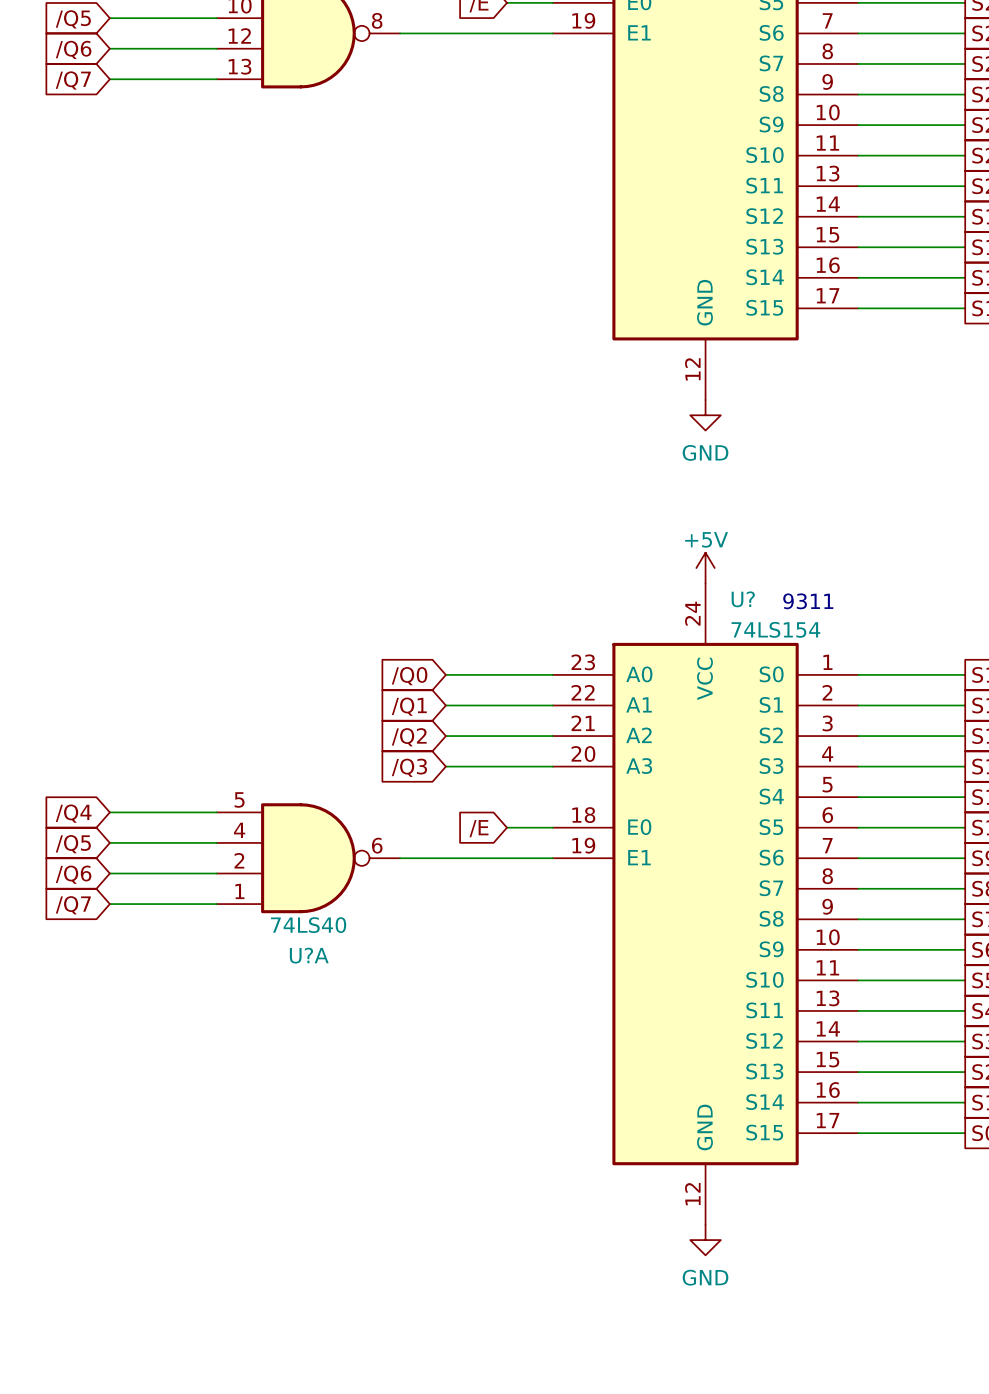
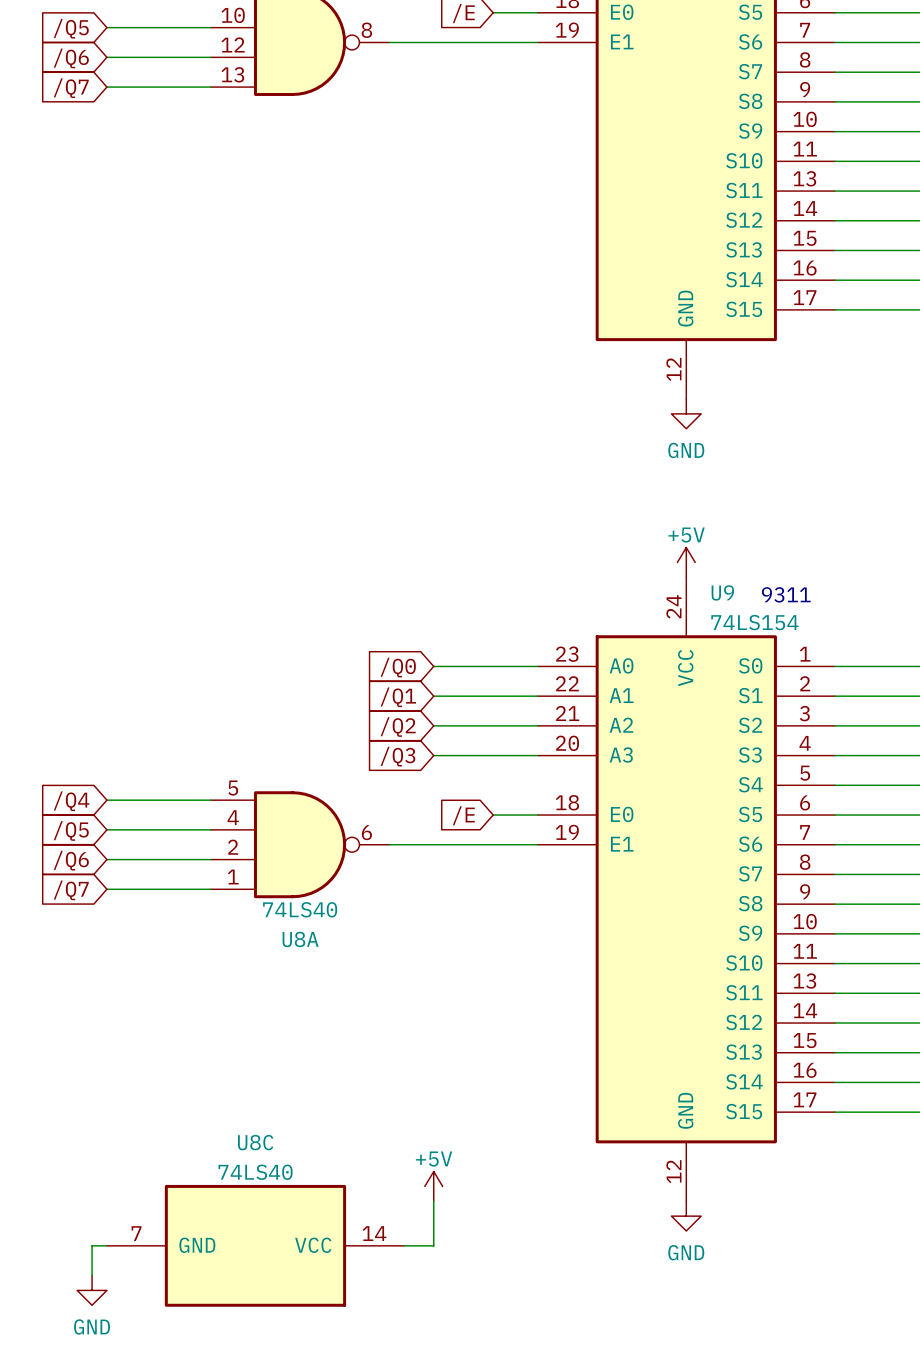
U? name: U? (743, 599) -> U9 (722, 592)
U?A name: U?A (309, 955) -> U8A (300, 939)
power symbol: none -> +5V (433, 1186)
wire: none -> (433, 1201) (433, 1245) (404, 1245)
wire: none -> (106, 1245) (92, 1245) (92, 1275)
U8C: none -> 74LS40 (255, 1245)
power symbol: none -> GND (92, 1290)

